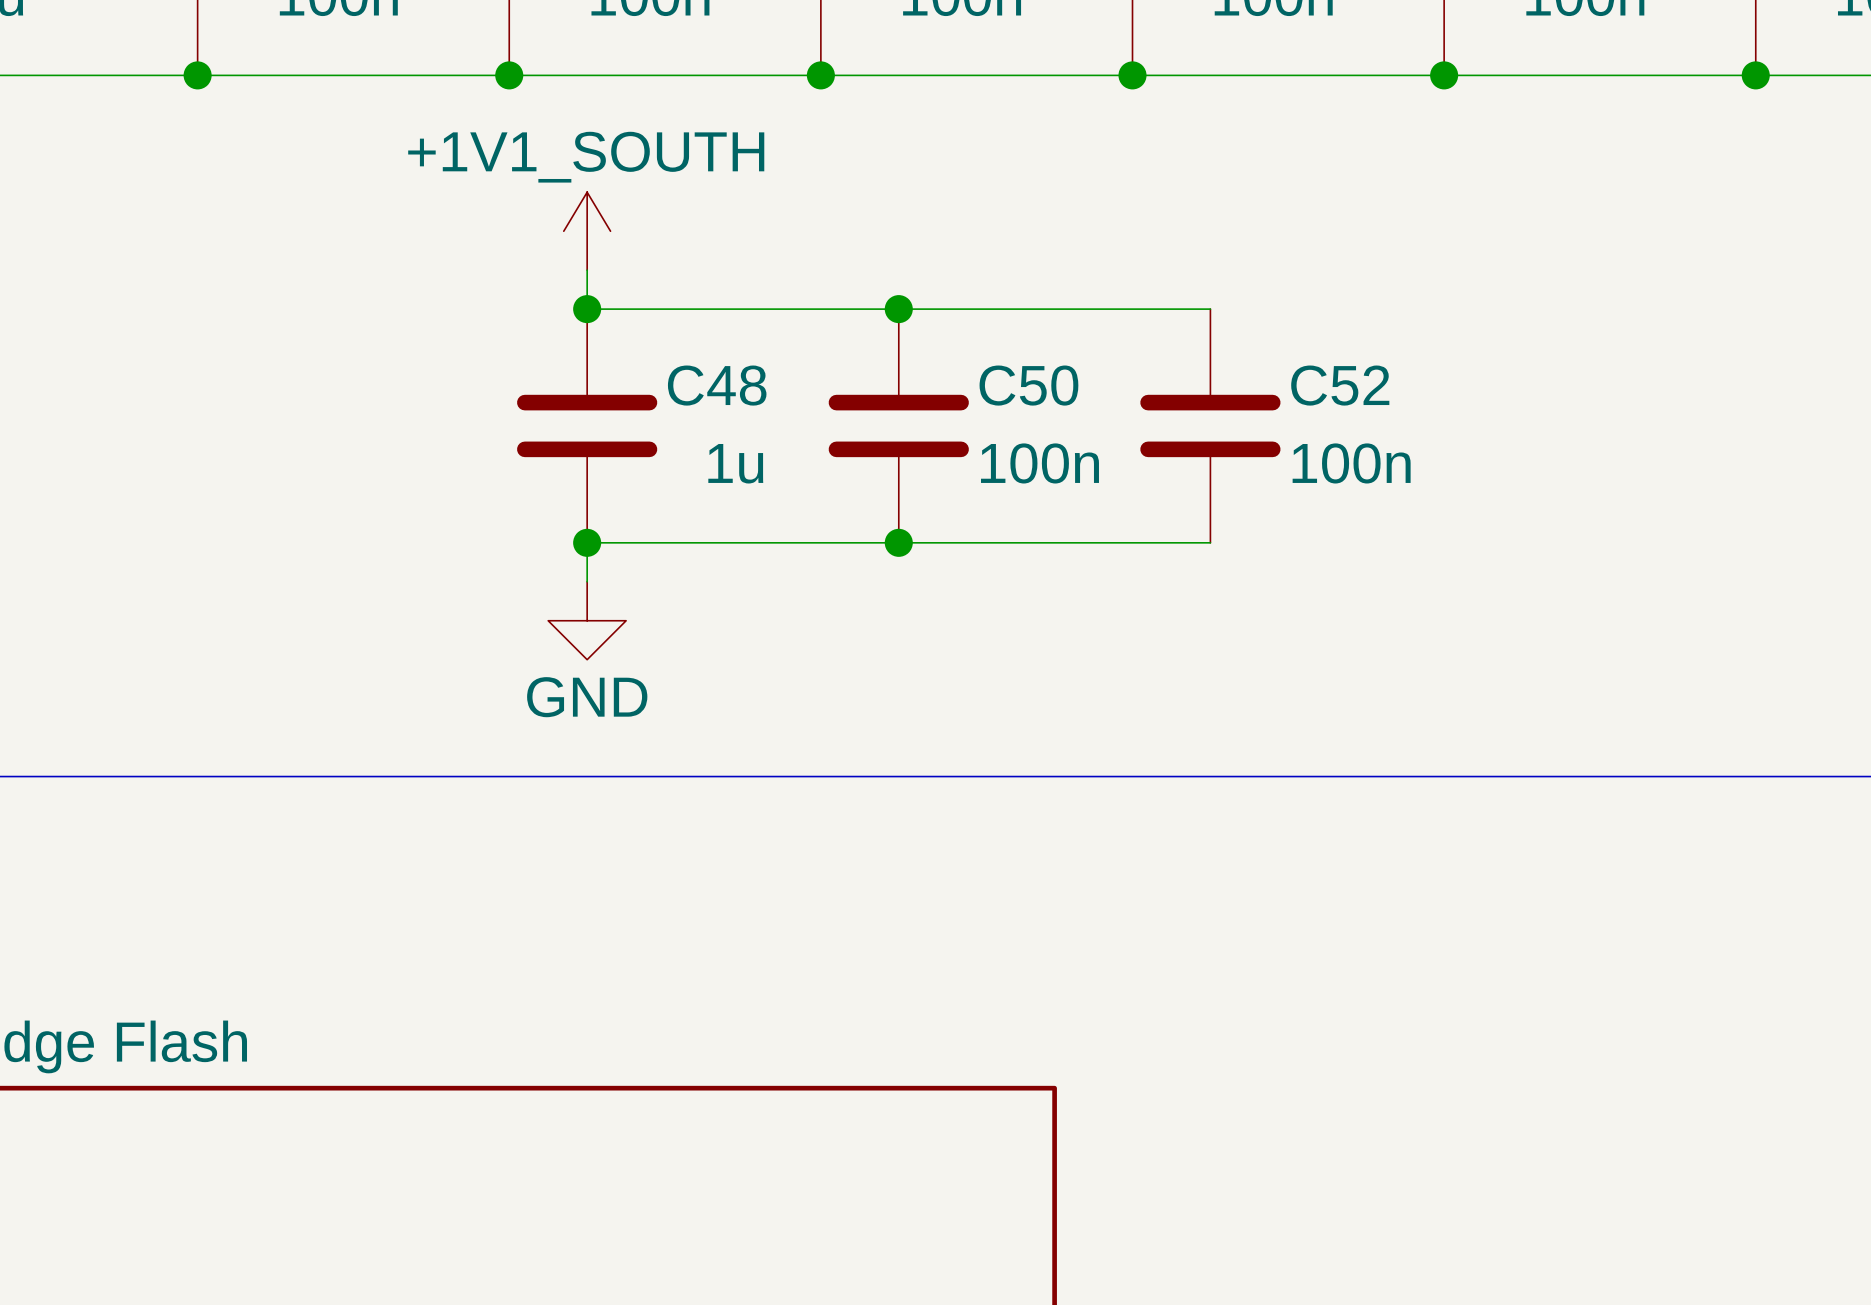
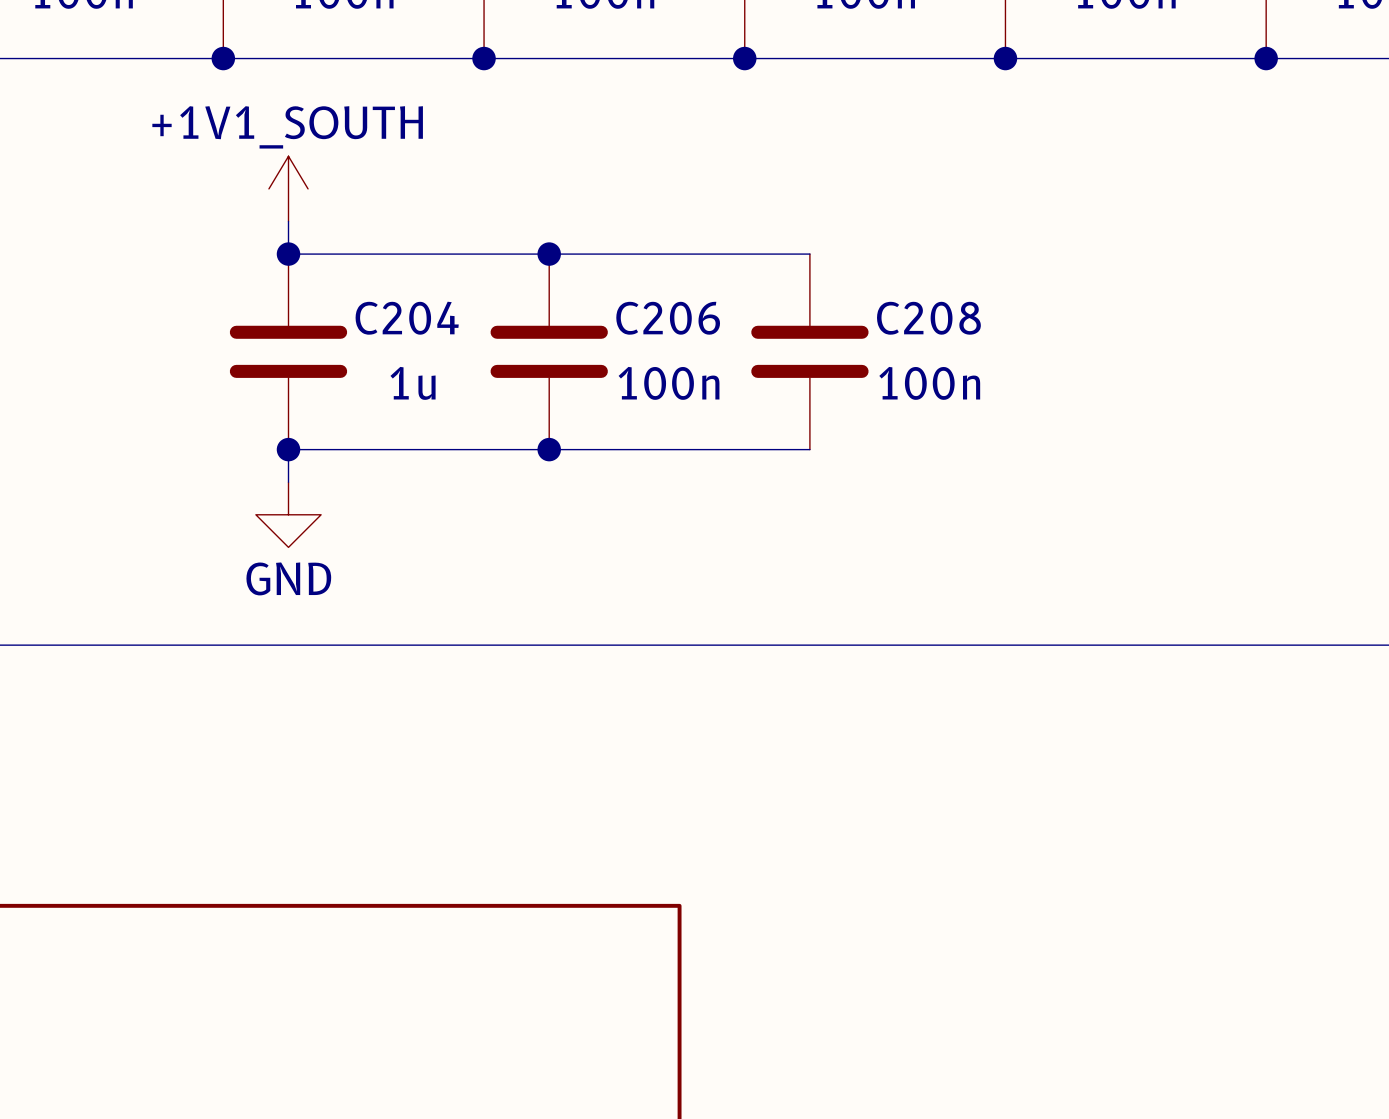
C48 name: C48 (717, 385) -> C204 (407, 318)
C50 name: C50 (1028, 385) -> C206 (668, 318)
C52 name: C52 (1340, 385) -> C208 (928, 318)

